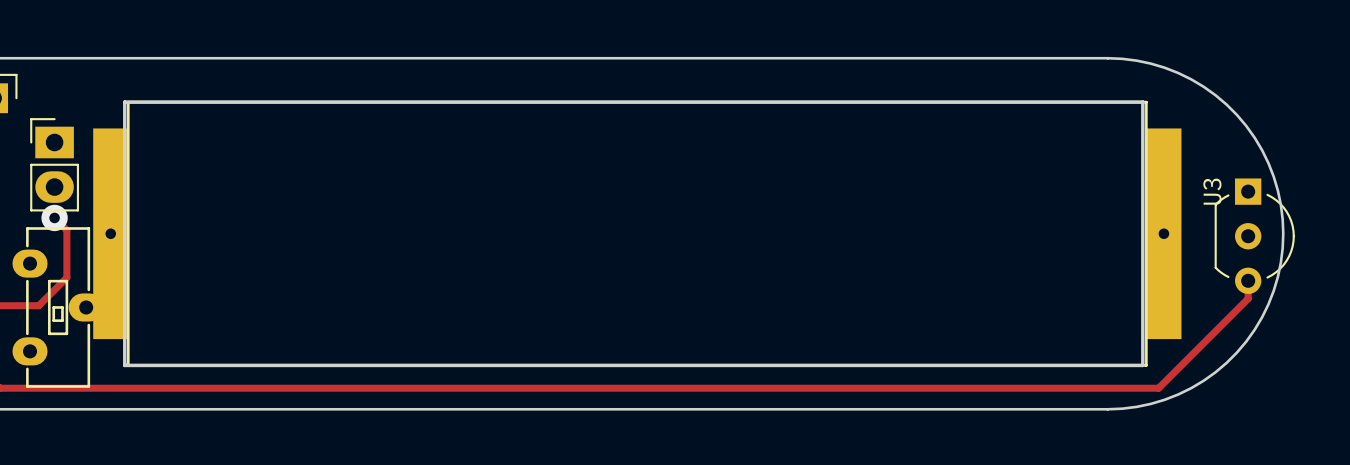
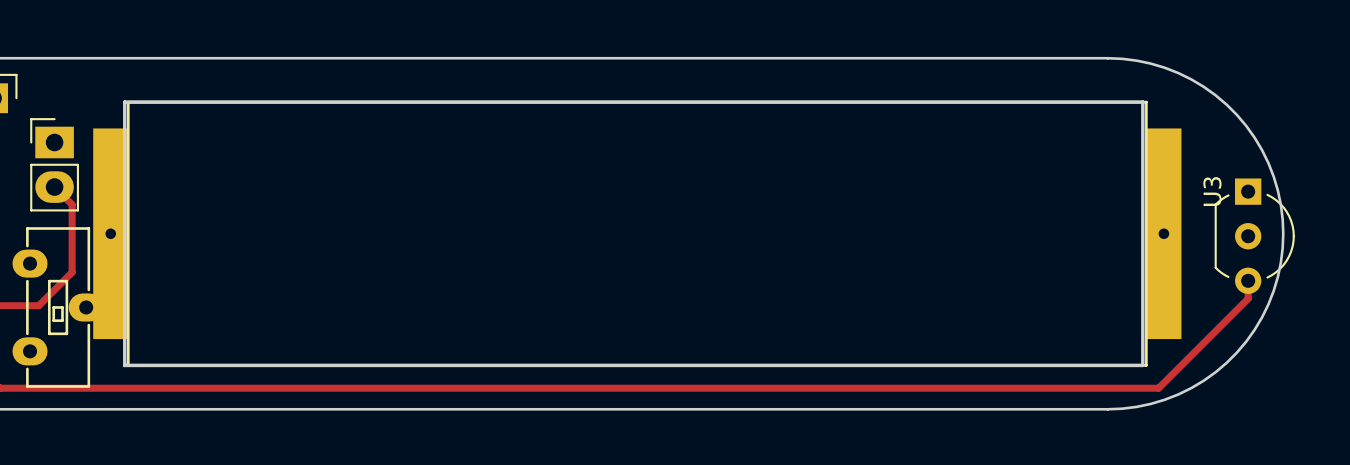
track: (54, 217) (66, 230) (66, 277) -> (54, 187) (72, 204) (72, 272) (66, 277)
via: (54, 217) -> none

